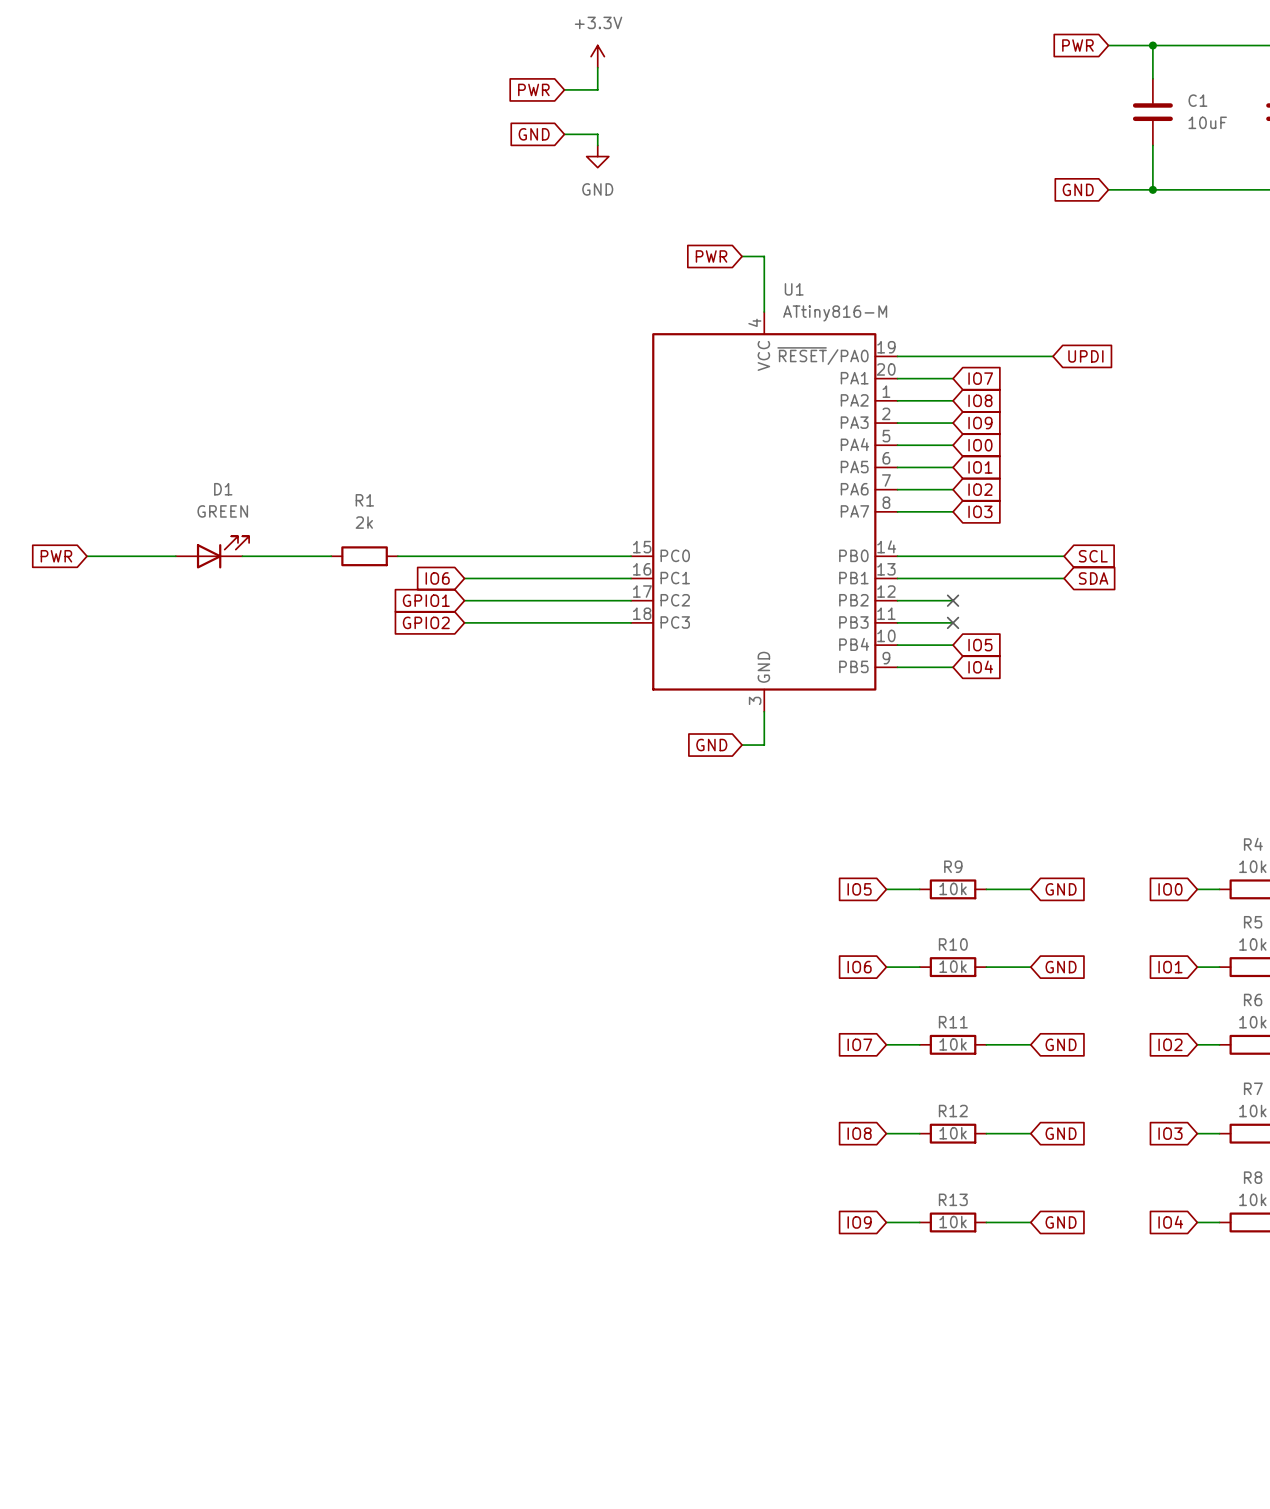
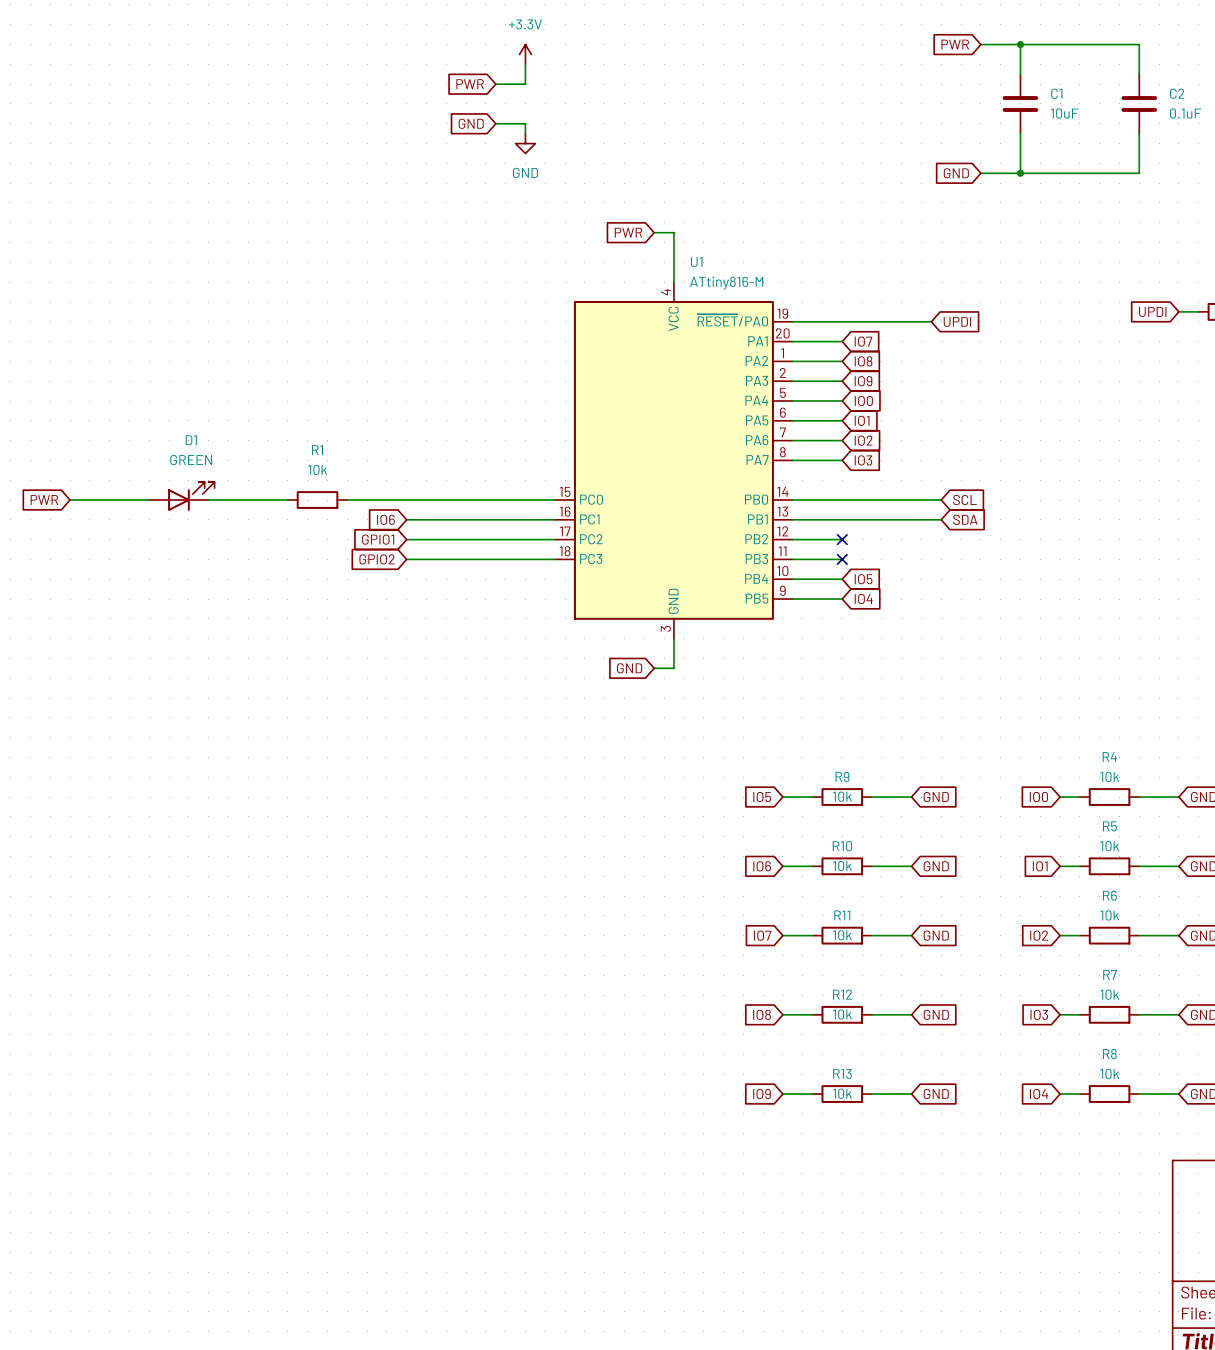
R1 value: 2k (364, 522) -> 10k (317, 469)

